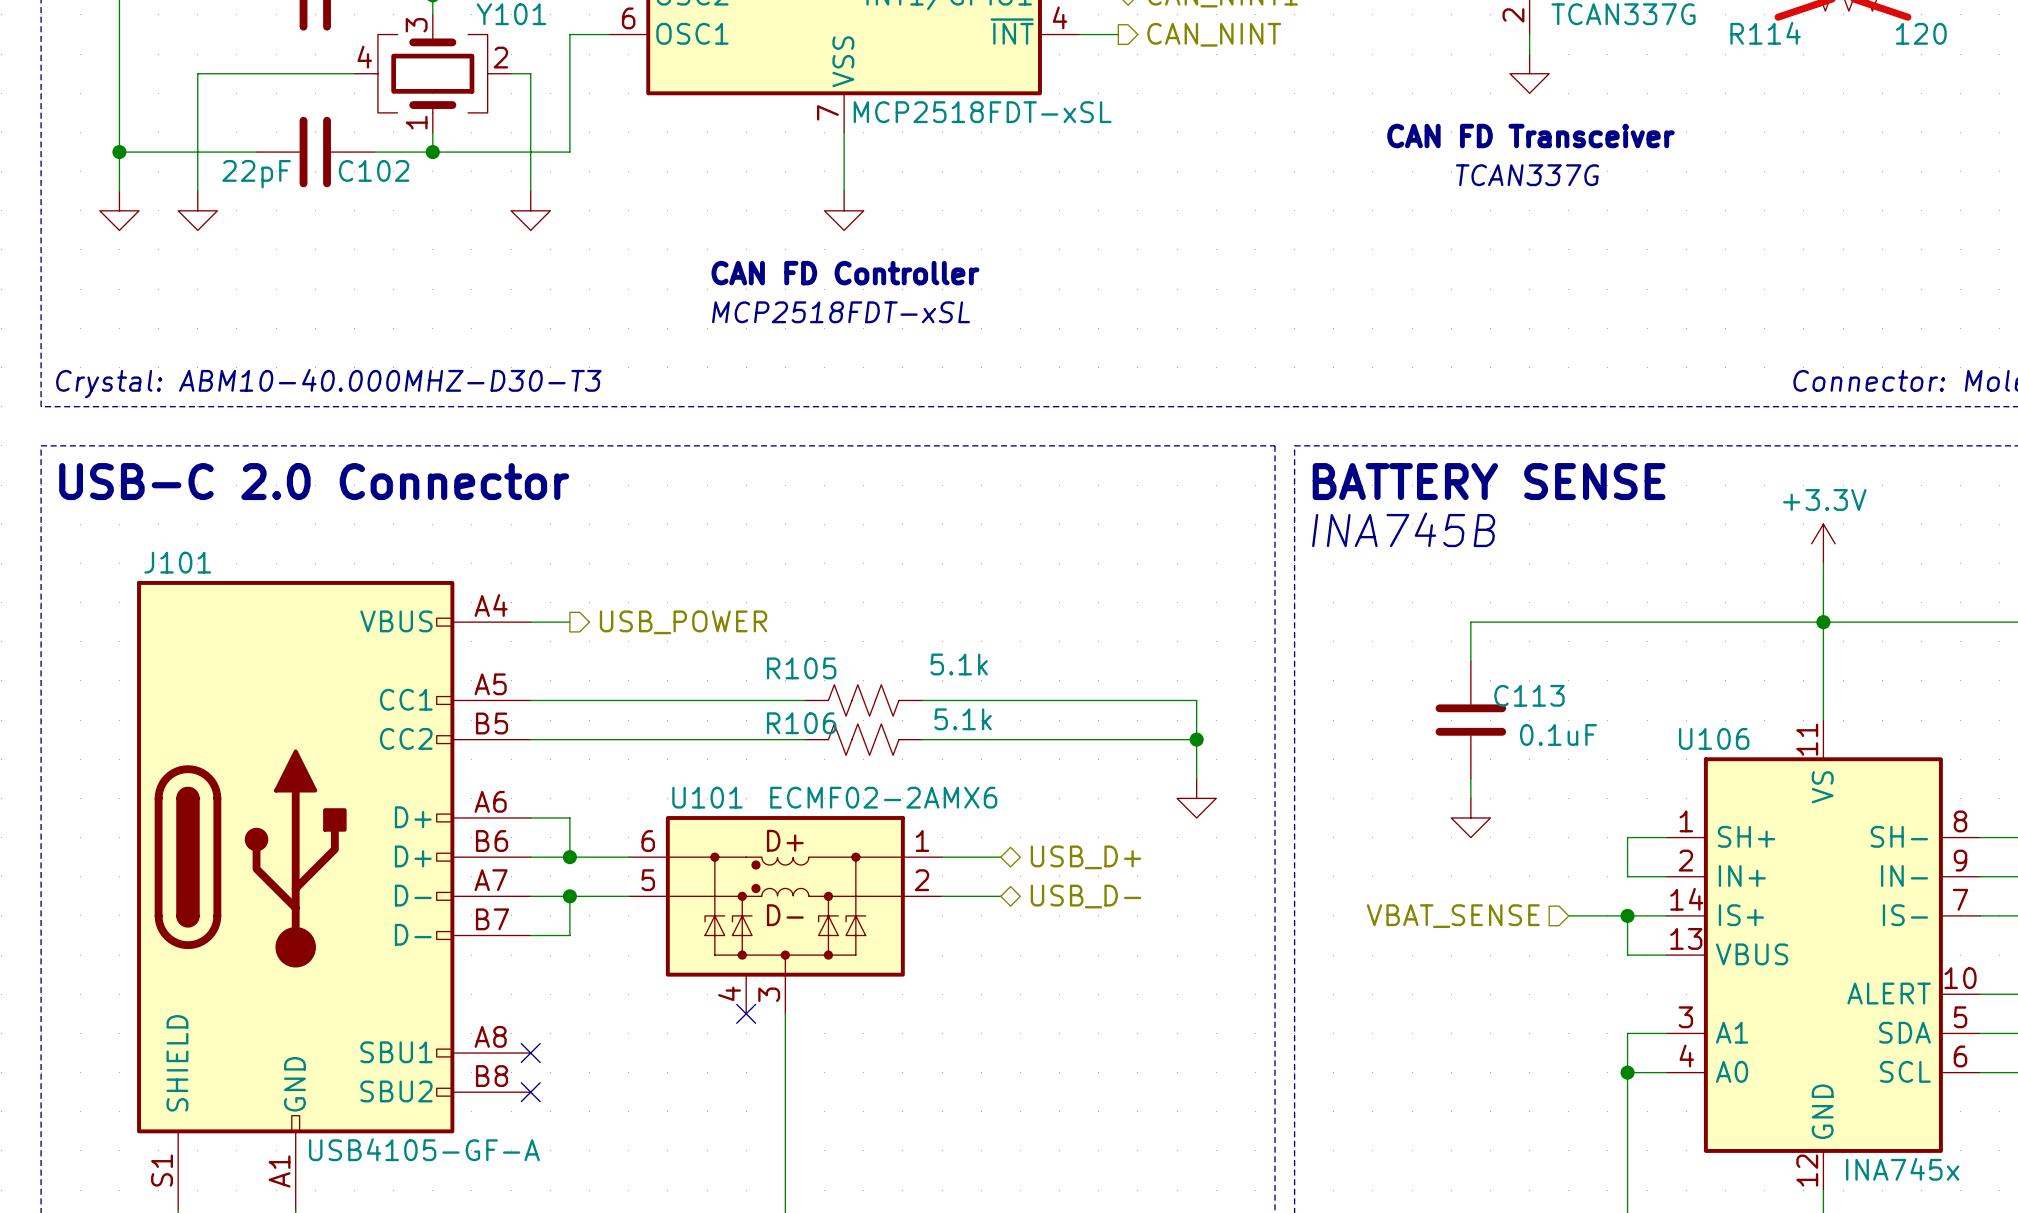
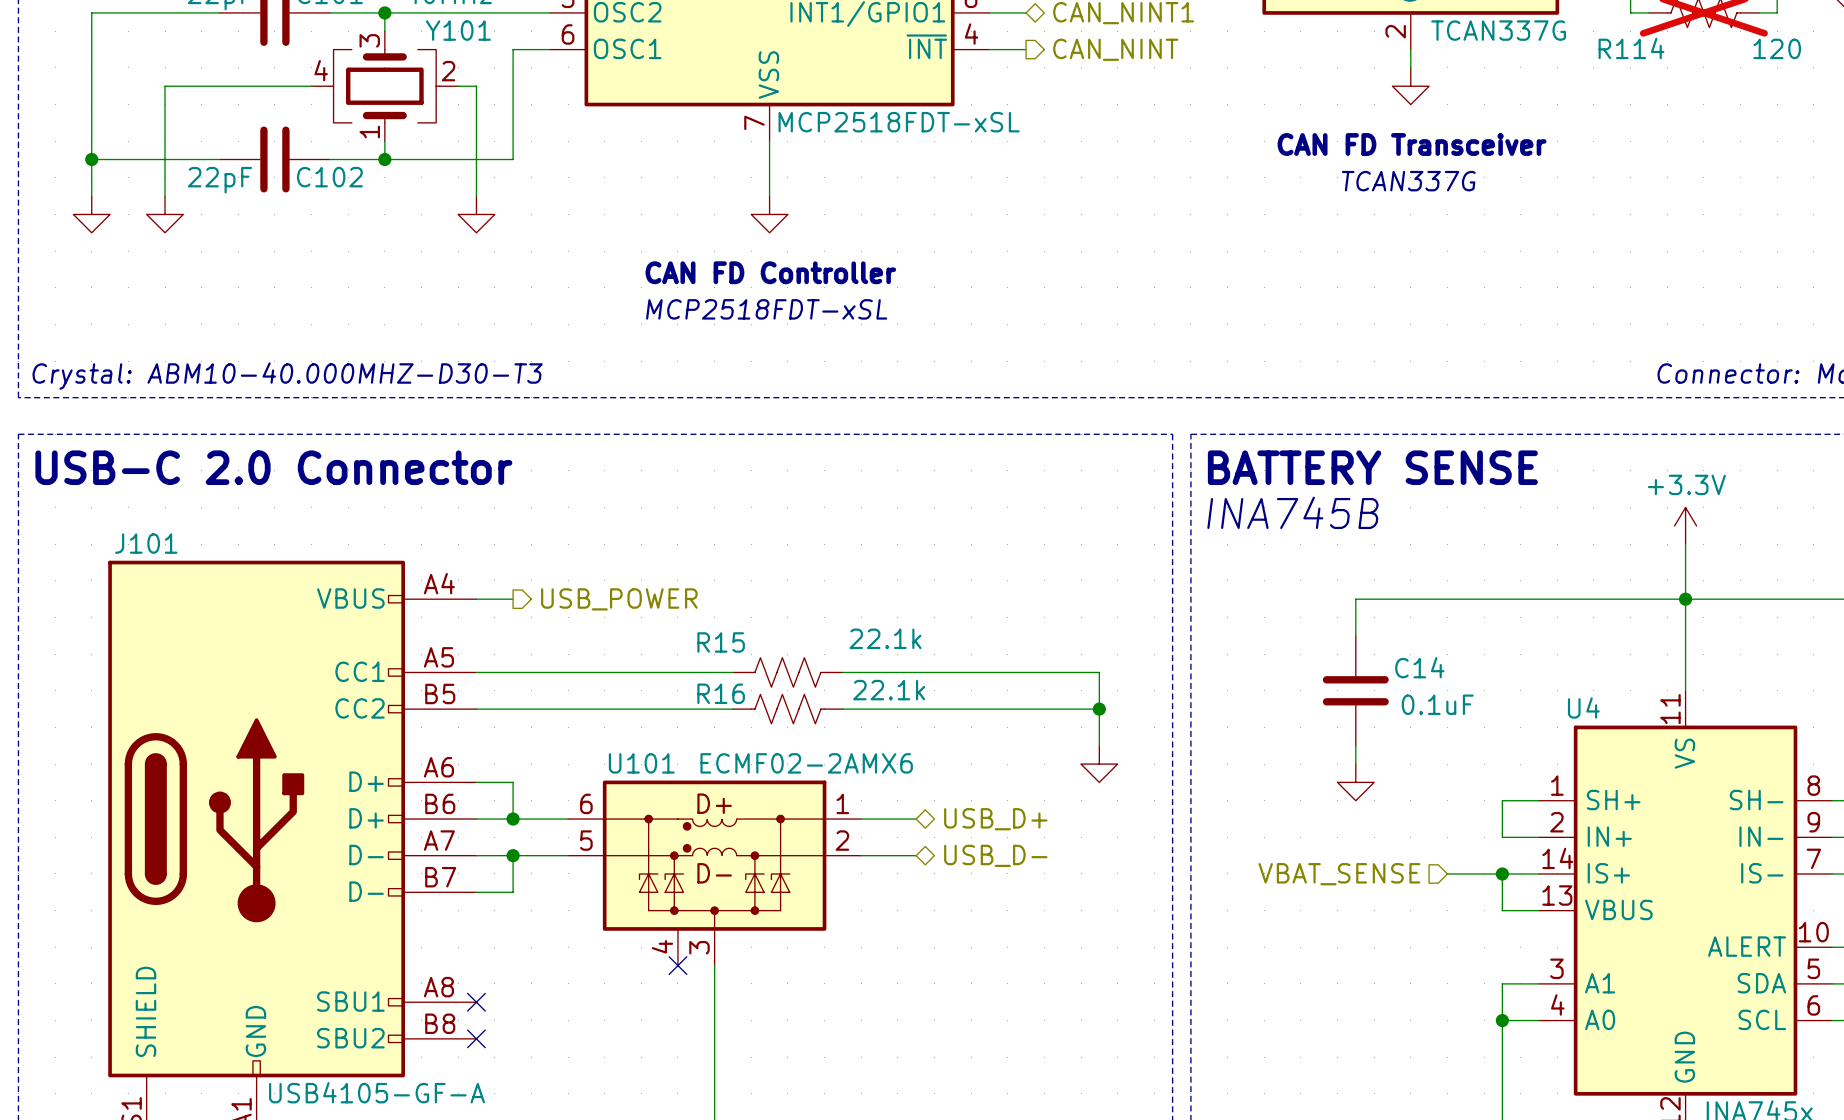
R105 value: 5.1k (959, 664) -> 22.1k (885, 638)
R105 name: R105 (801, 668) -> R15 (721, 642)
C113 name: C113 (1529, 695) -> C14 (1419, 667)
R106 value: 5.1k (963, 719) -> 22.1k (889, 690)
R106 name: R106 (801, 723) -> R16 (721, 693)
U106 name: U106 (1714, 738) -> U4 (1583, 707)

